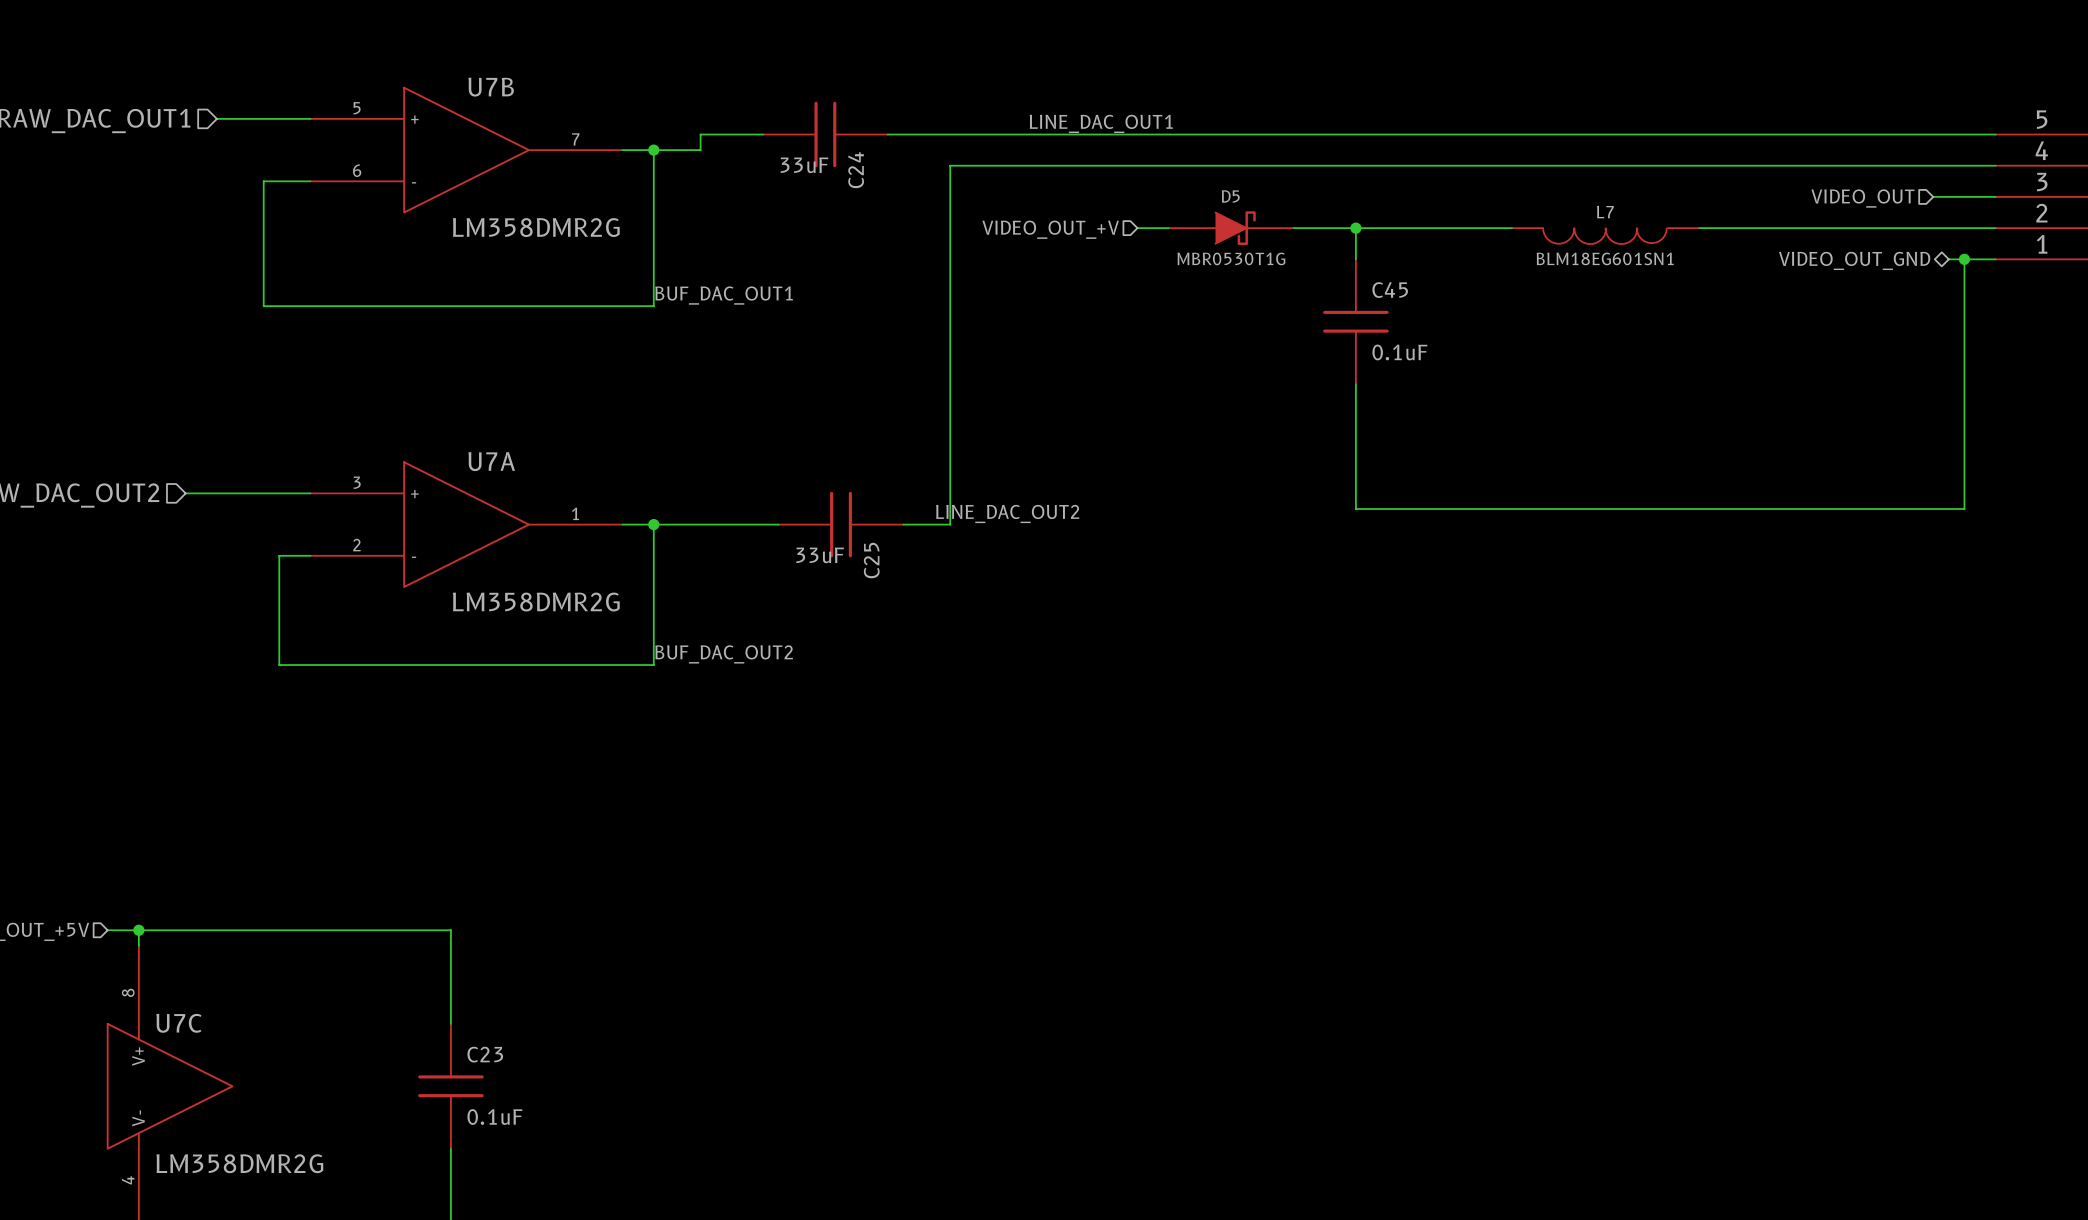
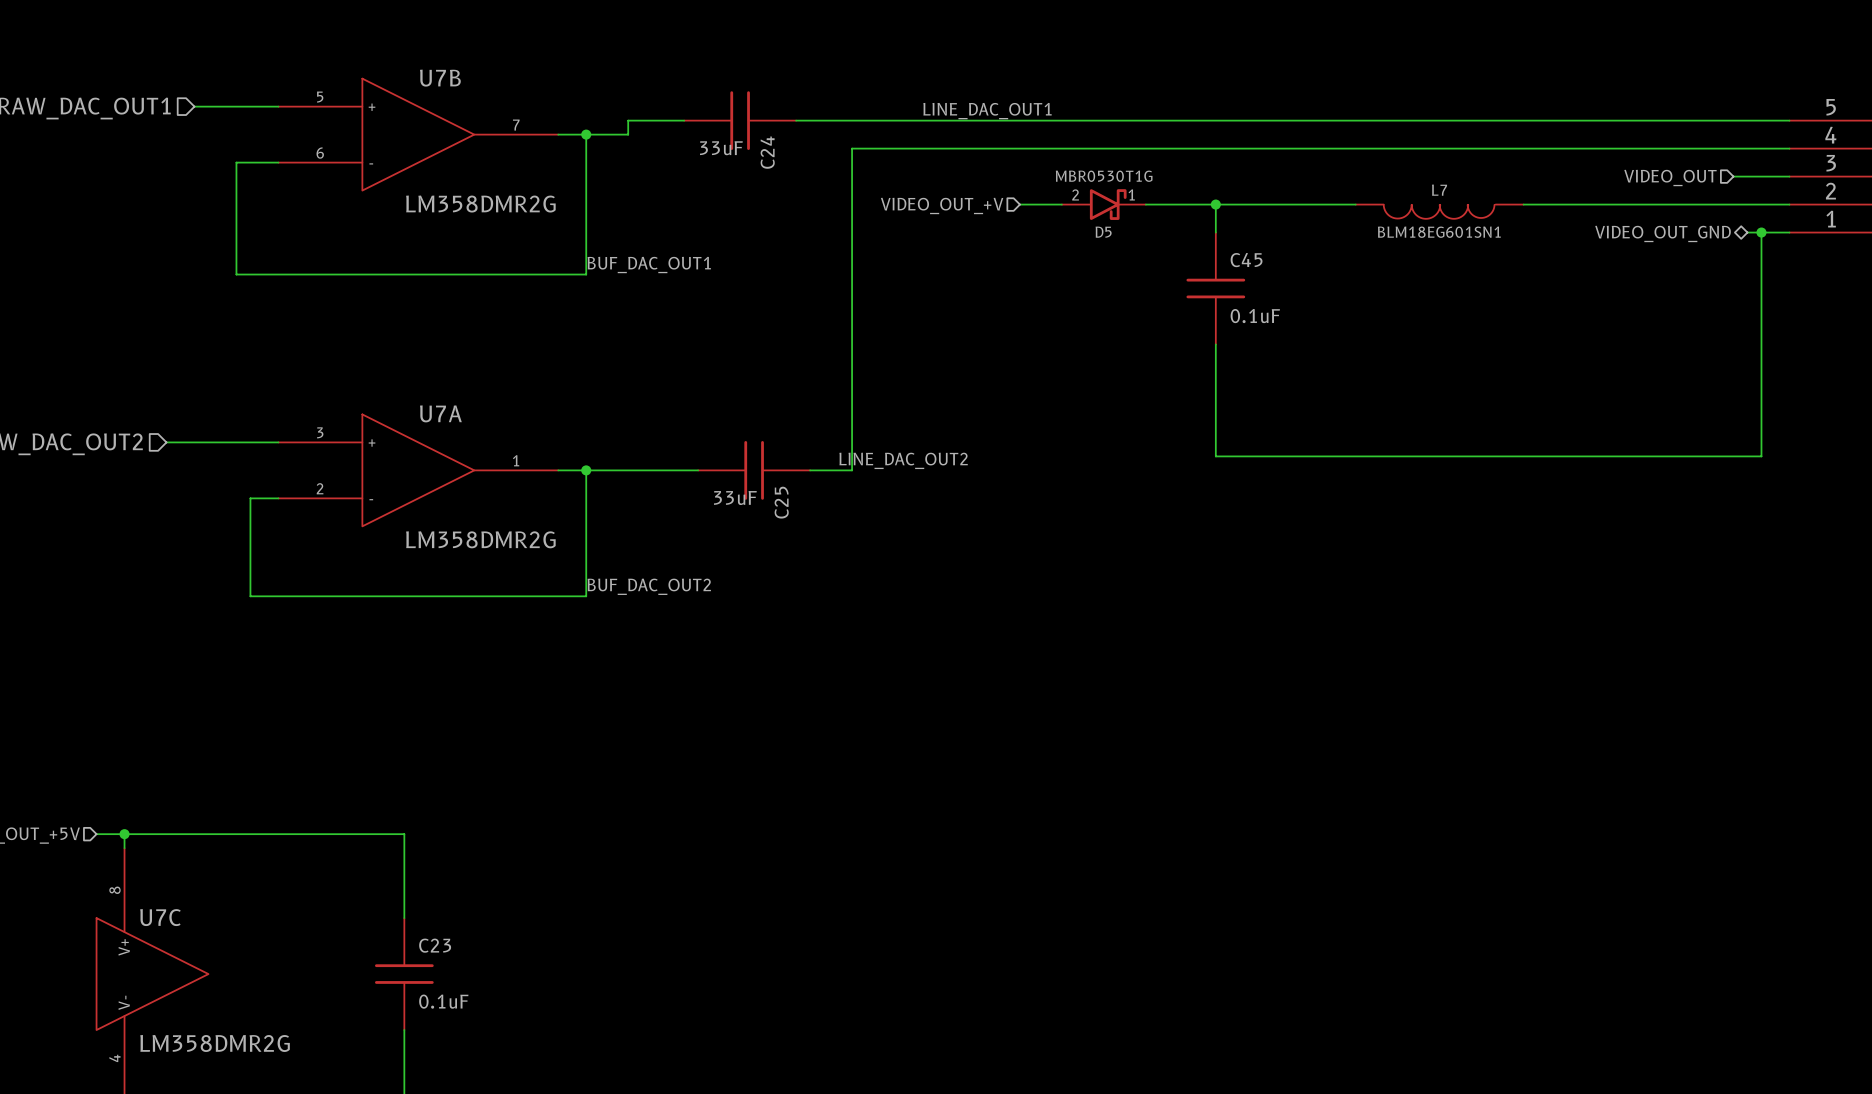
D5 name position: D5 (1230, 196) -> D5 (1103, 232)
D5 symbol: [1168, 211, 1294, 245] -> [1061, 189, 1146, 220]
D5 value position: MBR0530T1G (1231, 258) -> MBR0530T1G (1104, 176)

